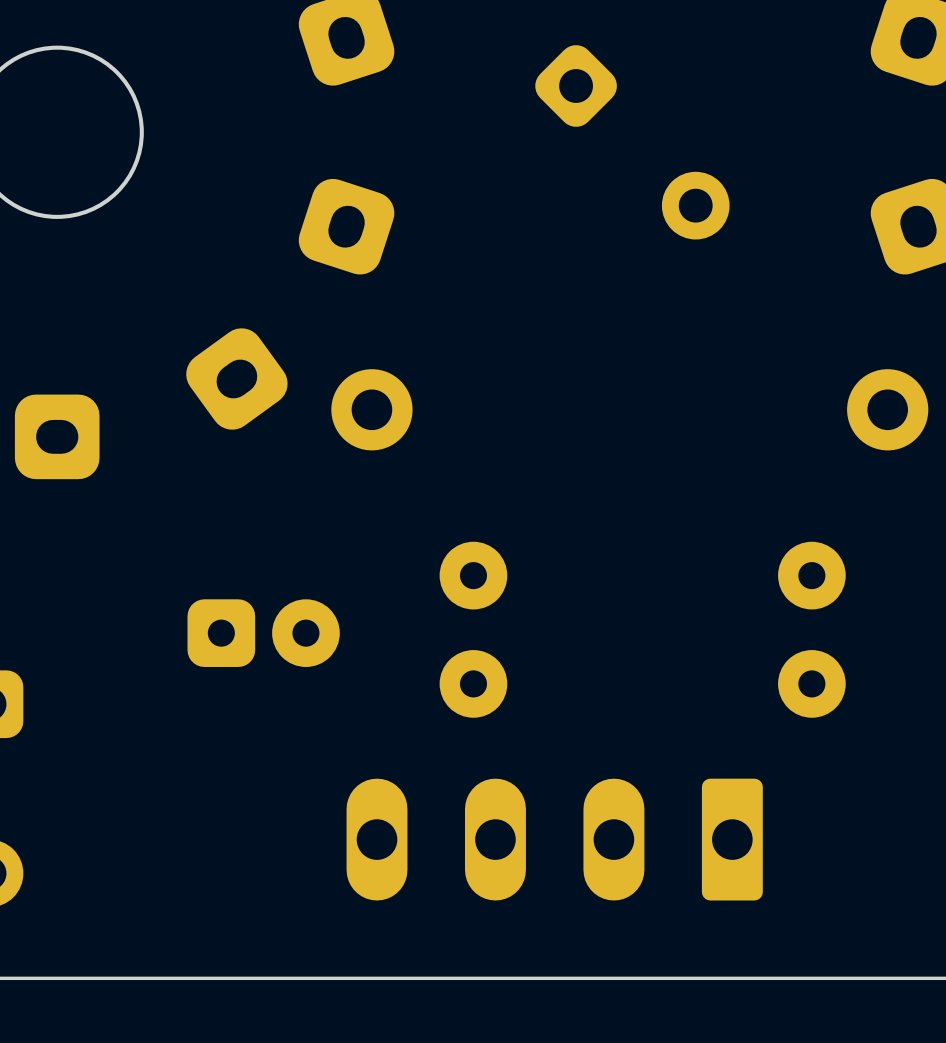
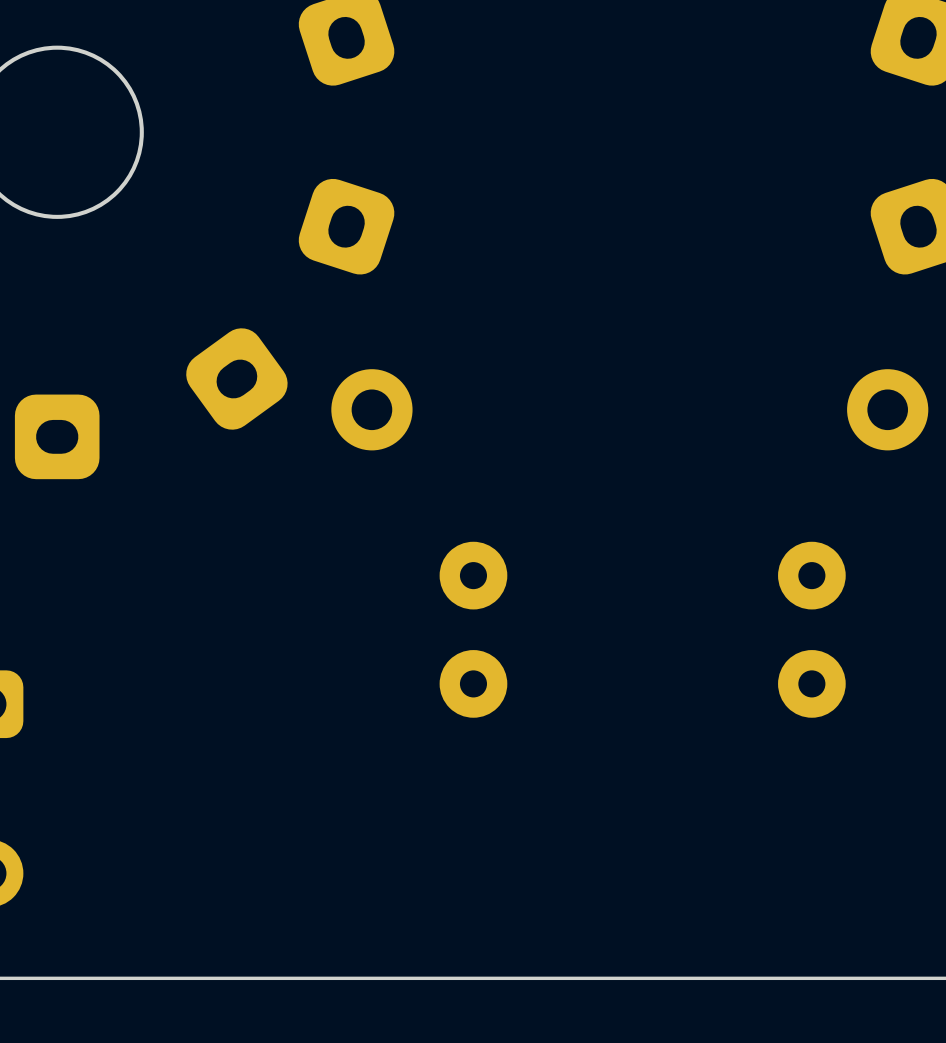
part: (632, 142) -> none
part: (263, 633) -> none
part: (554, 839) -> none

